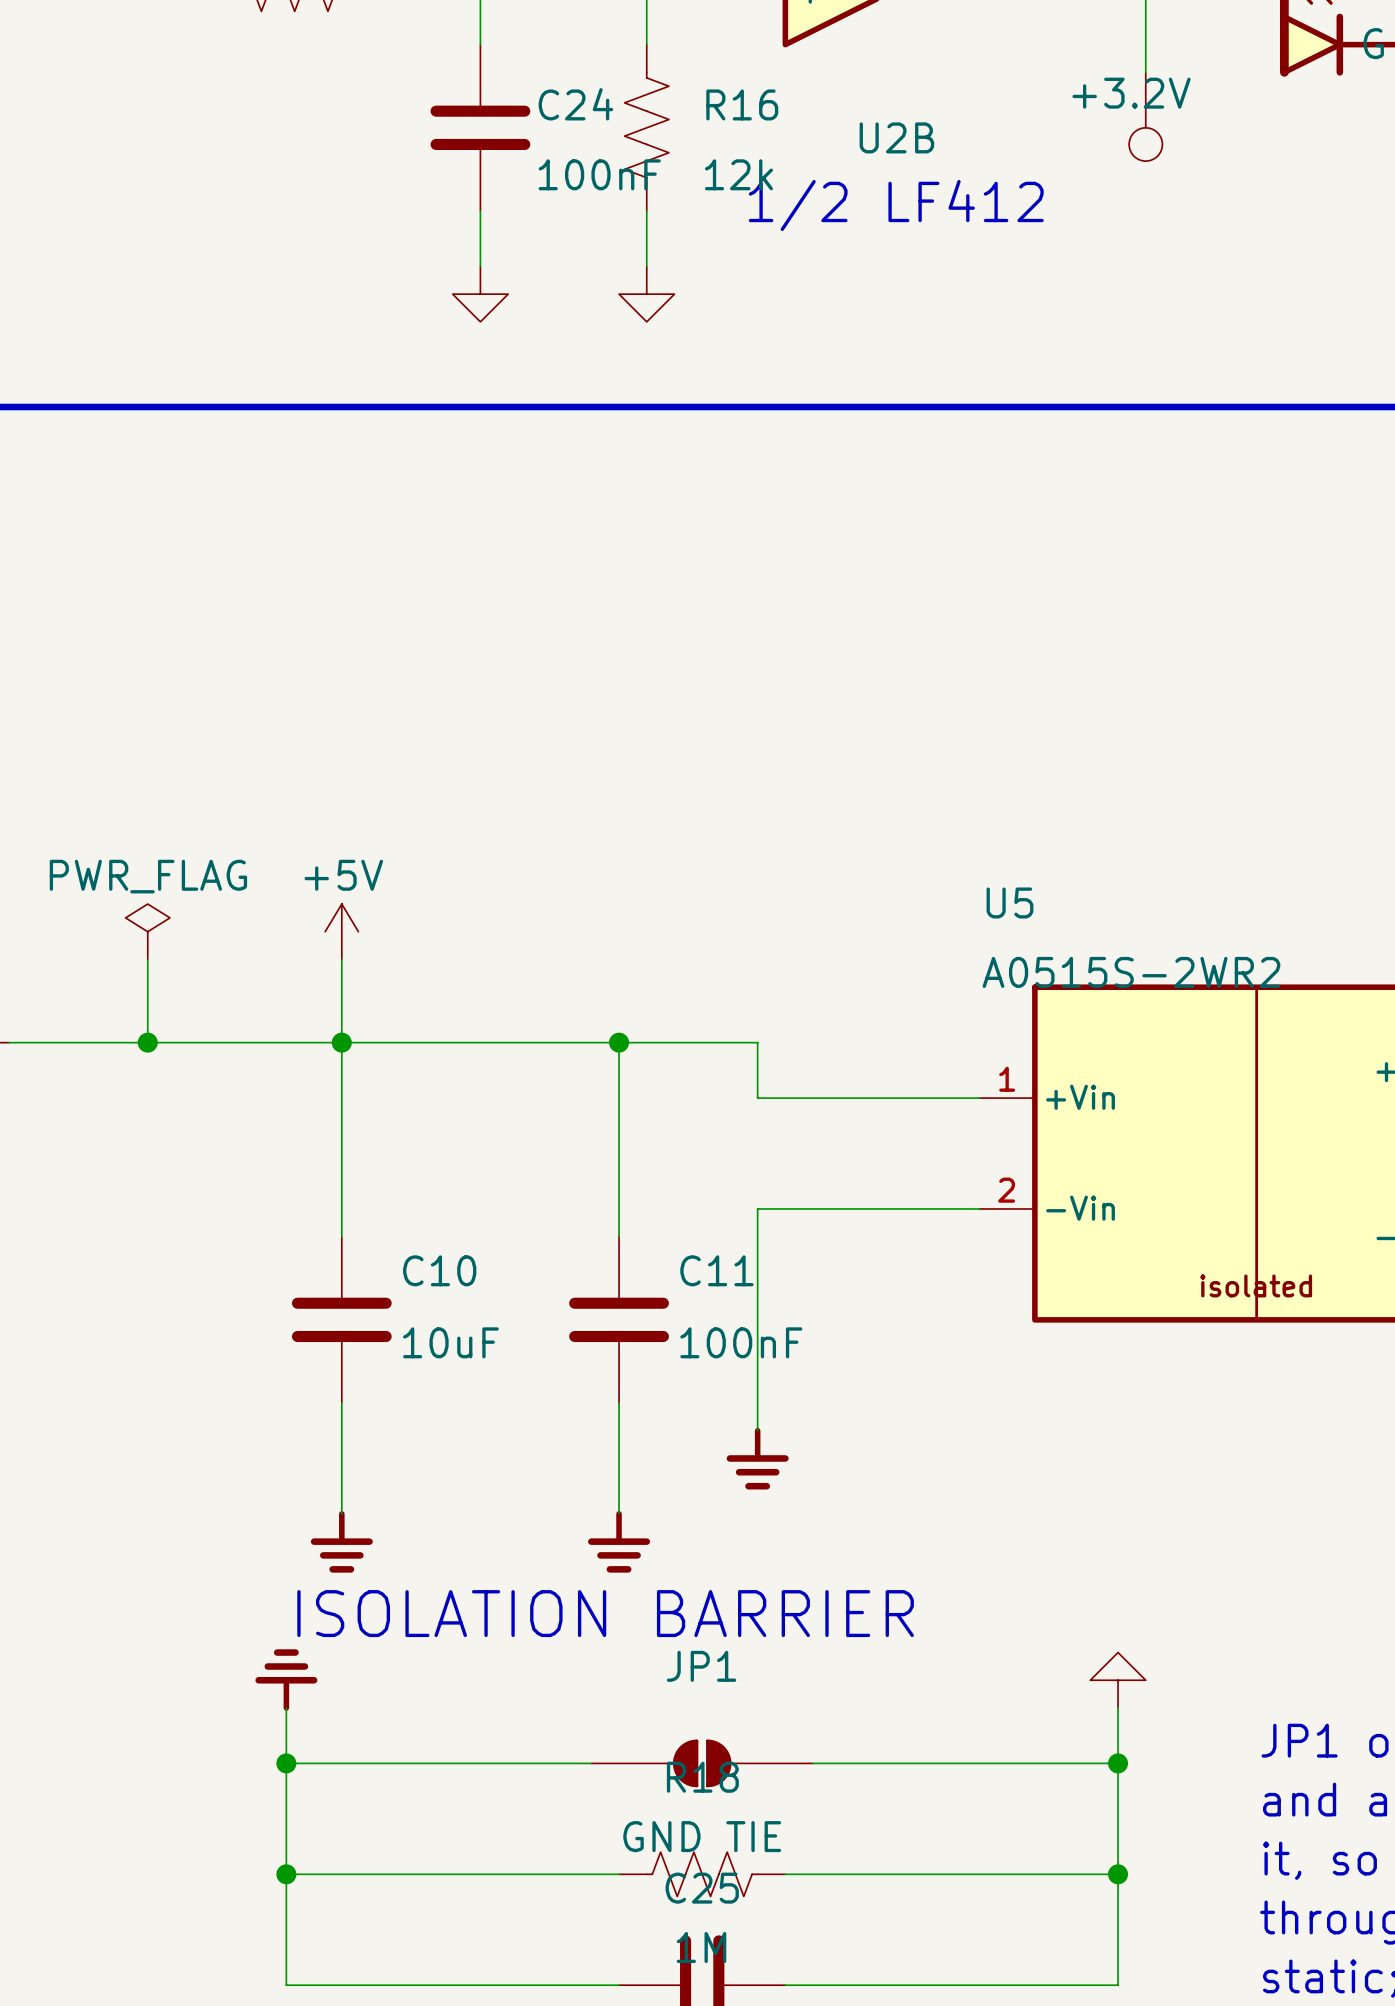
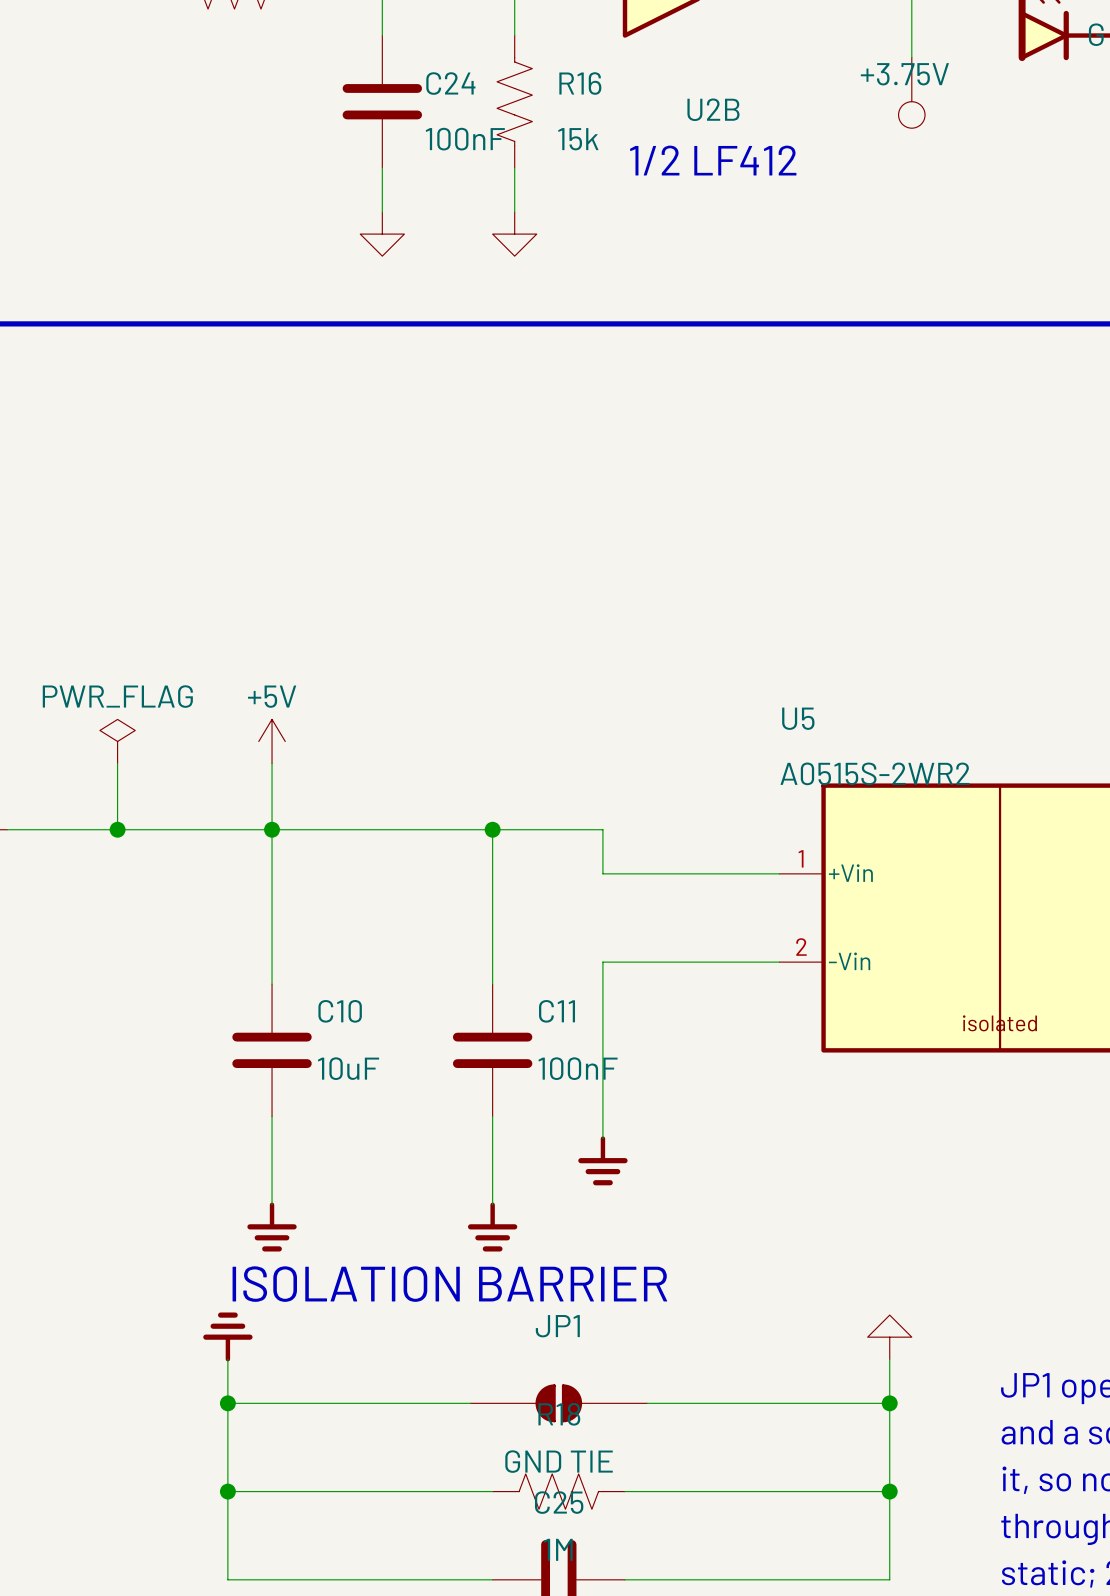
part value: +3.2V (1131, 93) -> +3.75V (904, 74)
R16 value: 12k (738, 174) -> 15k (578, 139)

